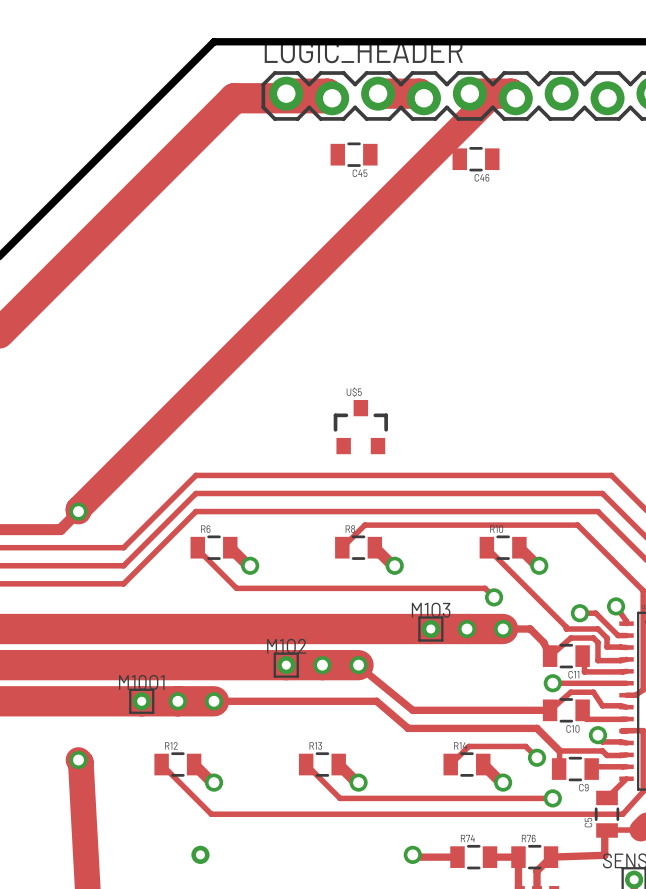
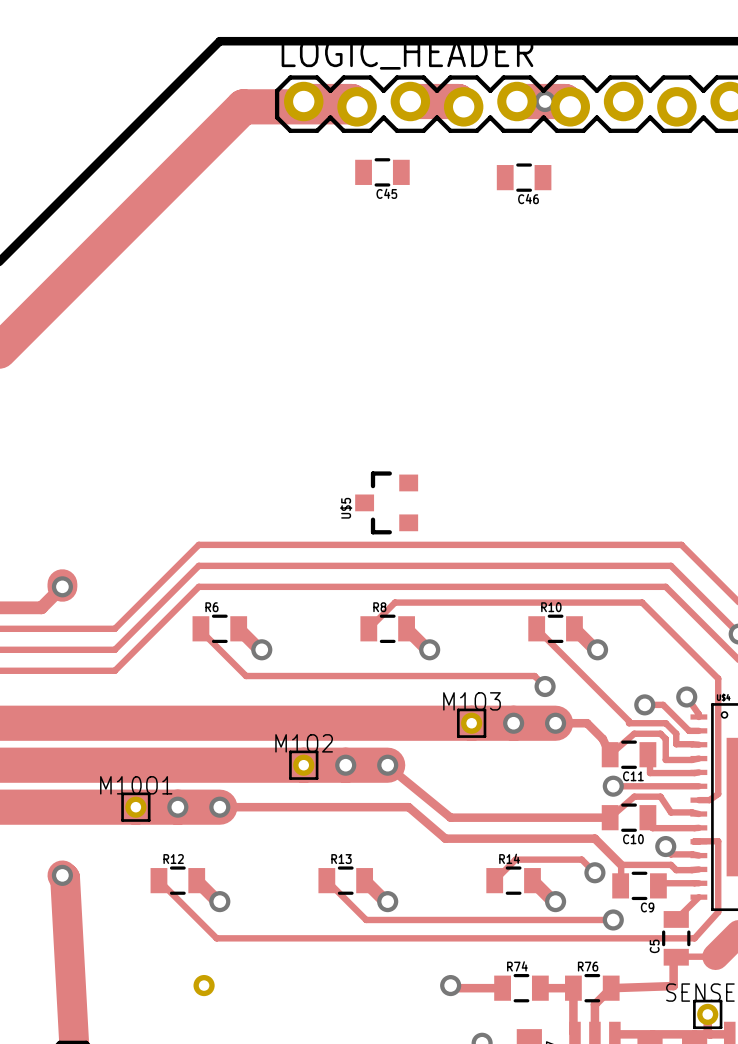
track: (494, 93) (78, 509) -> none
via: none -> (545, 101)
U$5 rotation: 0° (360, 427) -> 90° counterclockwise (386, 502)

